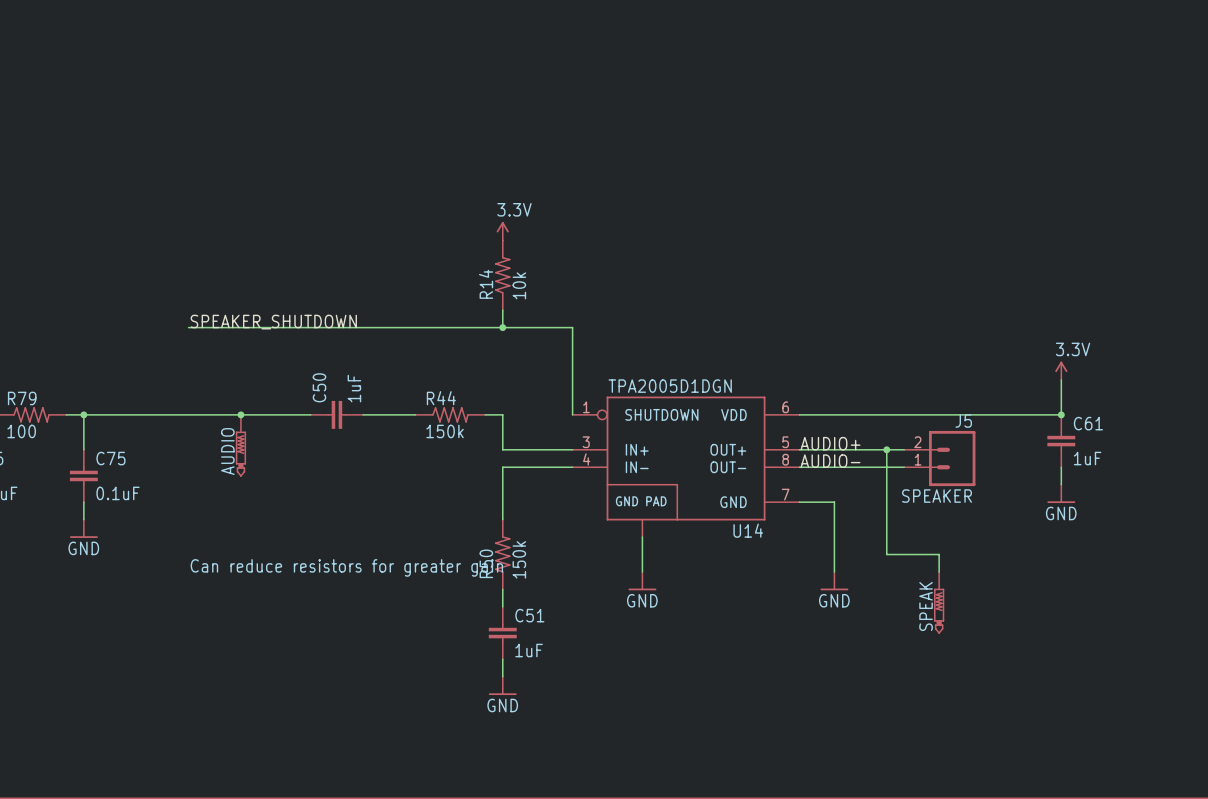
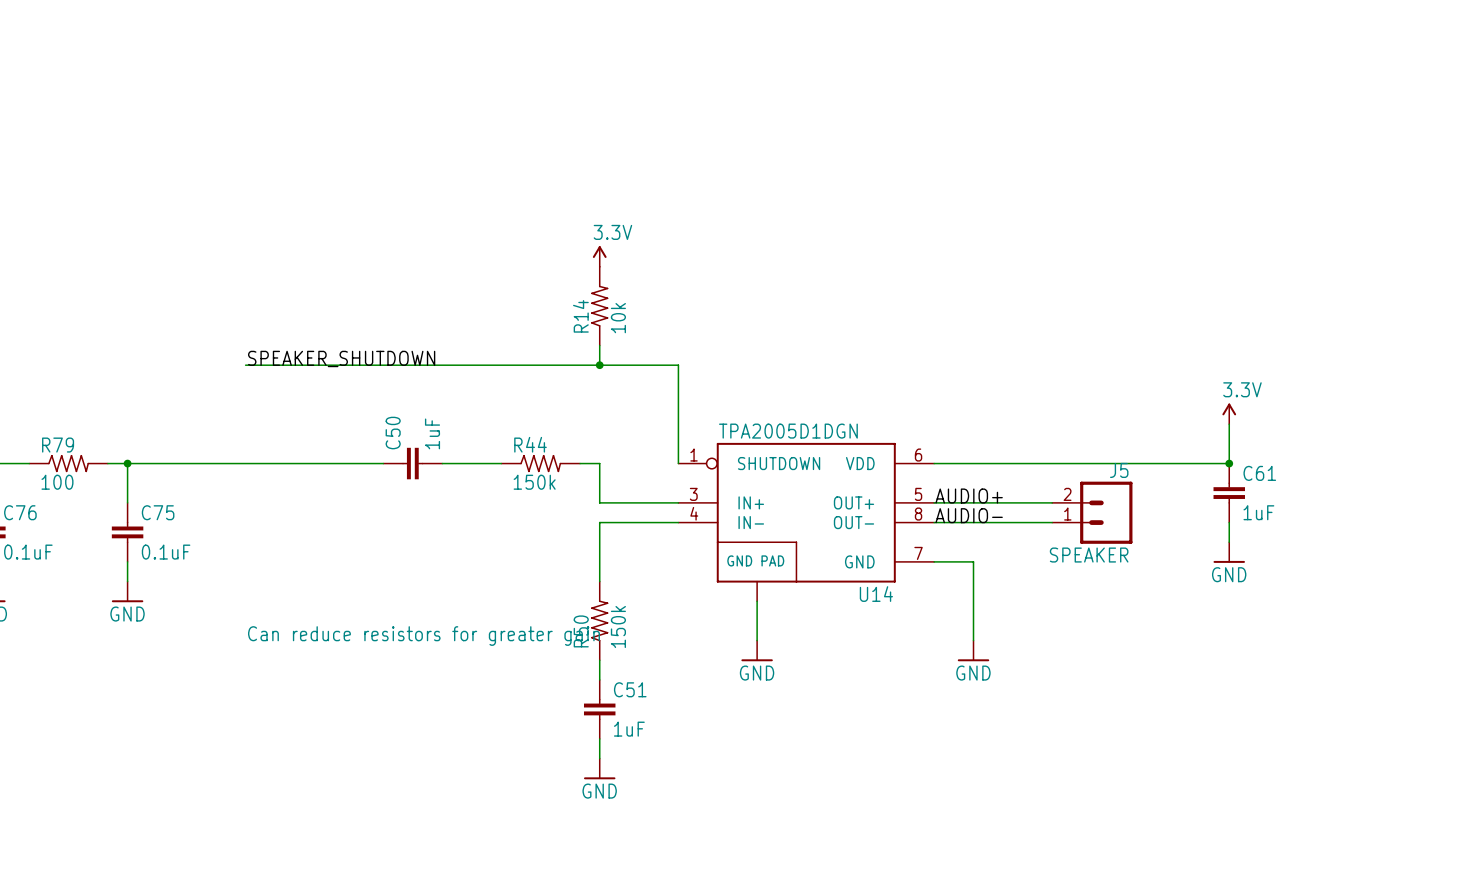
junction: (240, 414) -> none
AUDIO: (240, 445) -> none
wire: (886, 449) (886, 554) (939, 554) (939, 571) -> none
junction: (886, 449) -> none
SPEAK: (939, 602) -> none

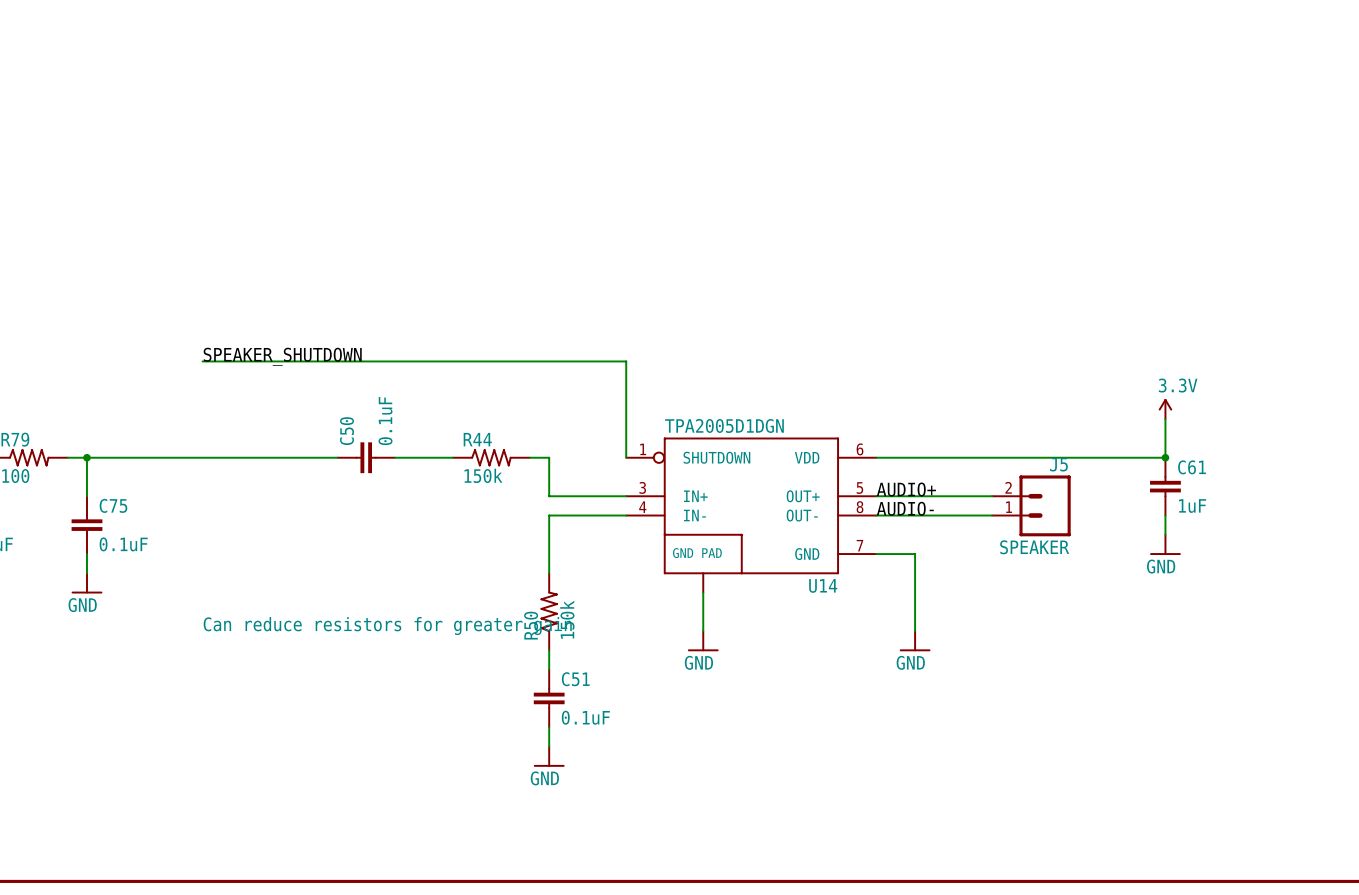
power symbol: 3.3V (599, 256) -> none
R14: 10k (599, 306) -> none
wire: (599, 345) (599, 365) -> none
junction: (599, 365) -> none
C50 value: 1uF (432, 433) -> 0.1uF (385, 421)
C51 value: 1uF (629, 729) -> 0.1uF (585, 717)

